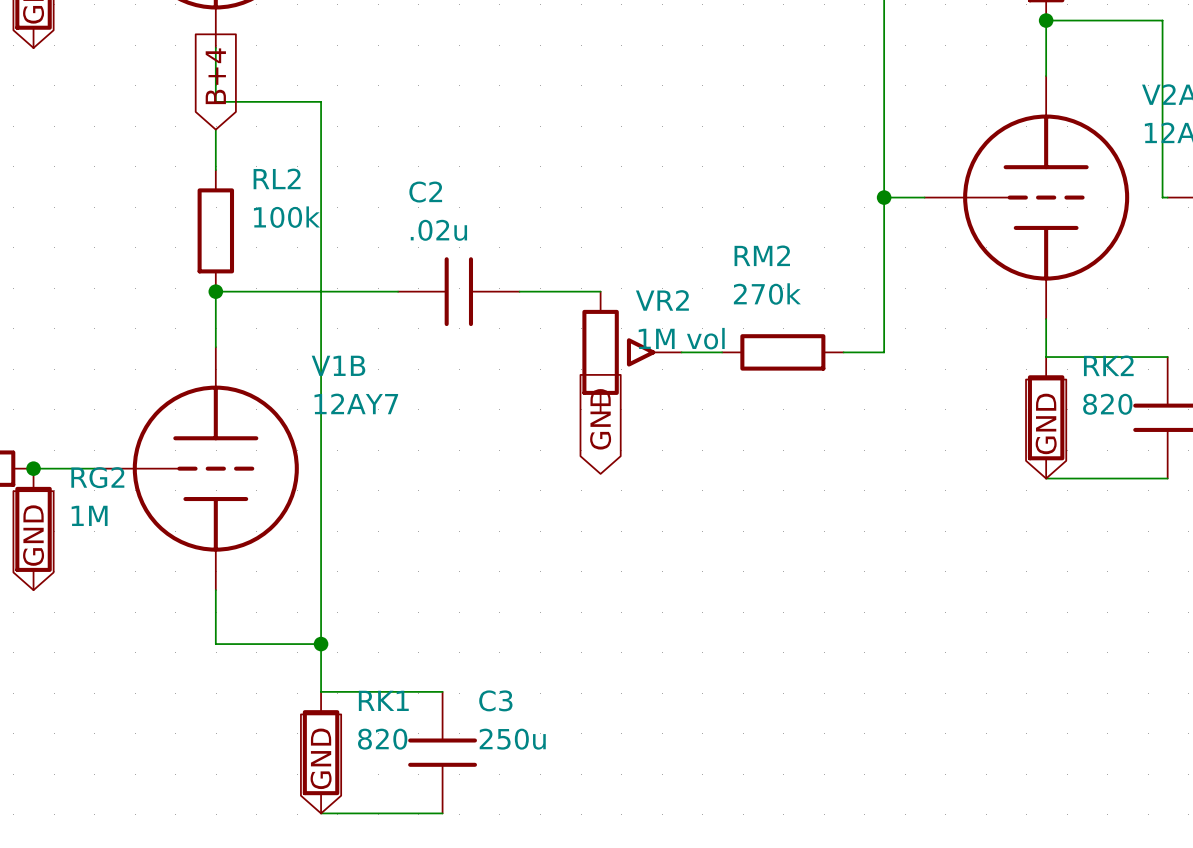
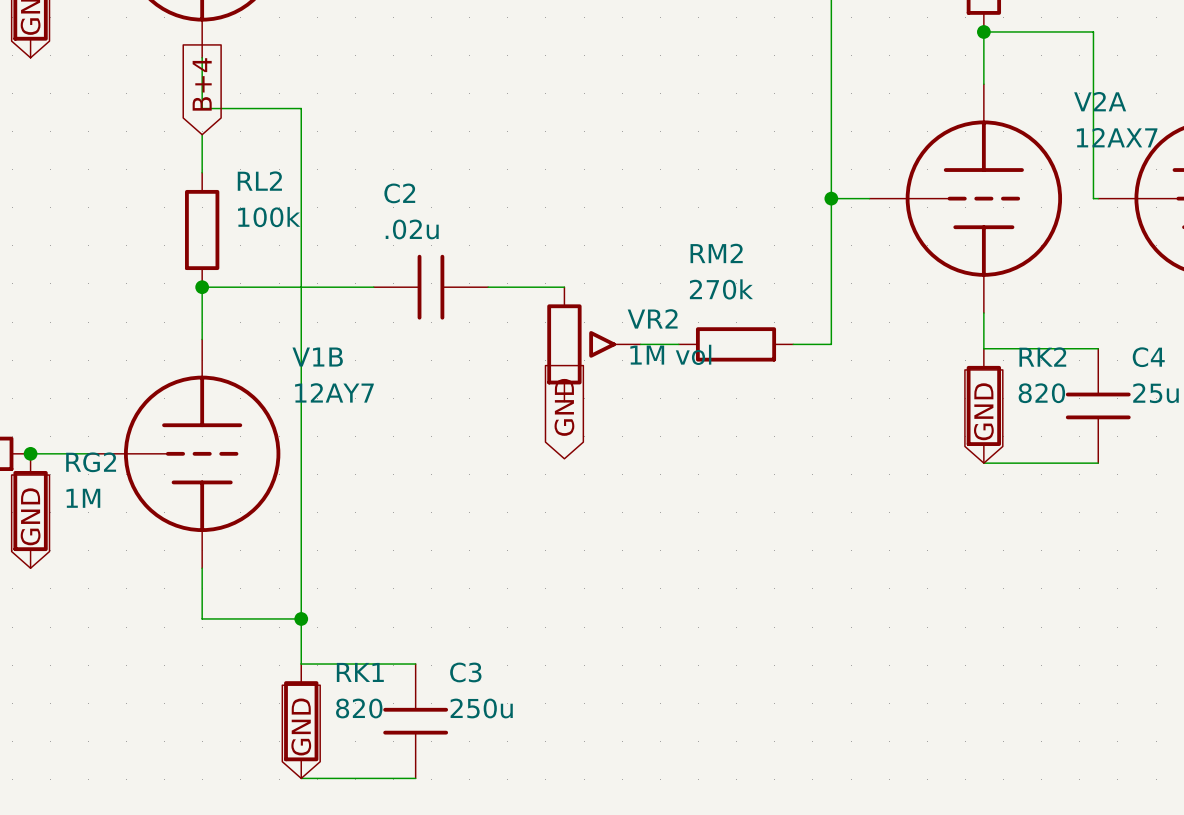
VR2 name position: VR2 (662, 300) -> VR2 (652, 318)
VR2 value position: 1M vol (681, 338) -> 1M vol (670, 354)

